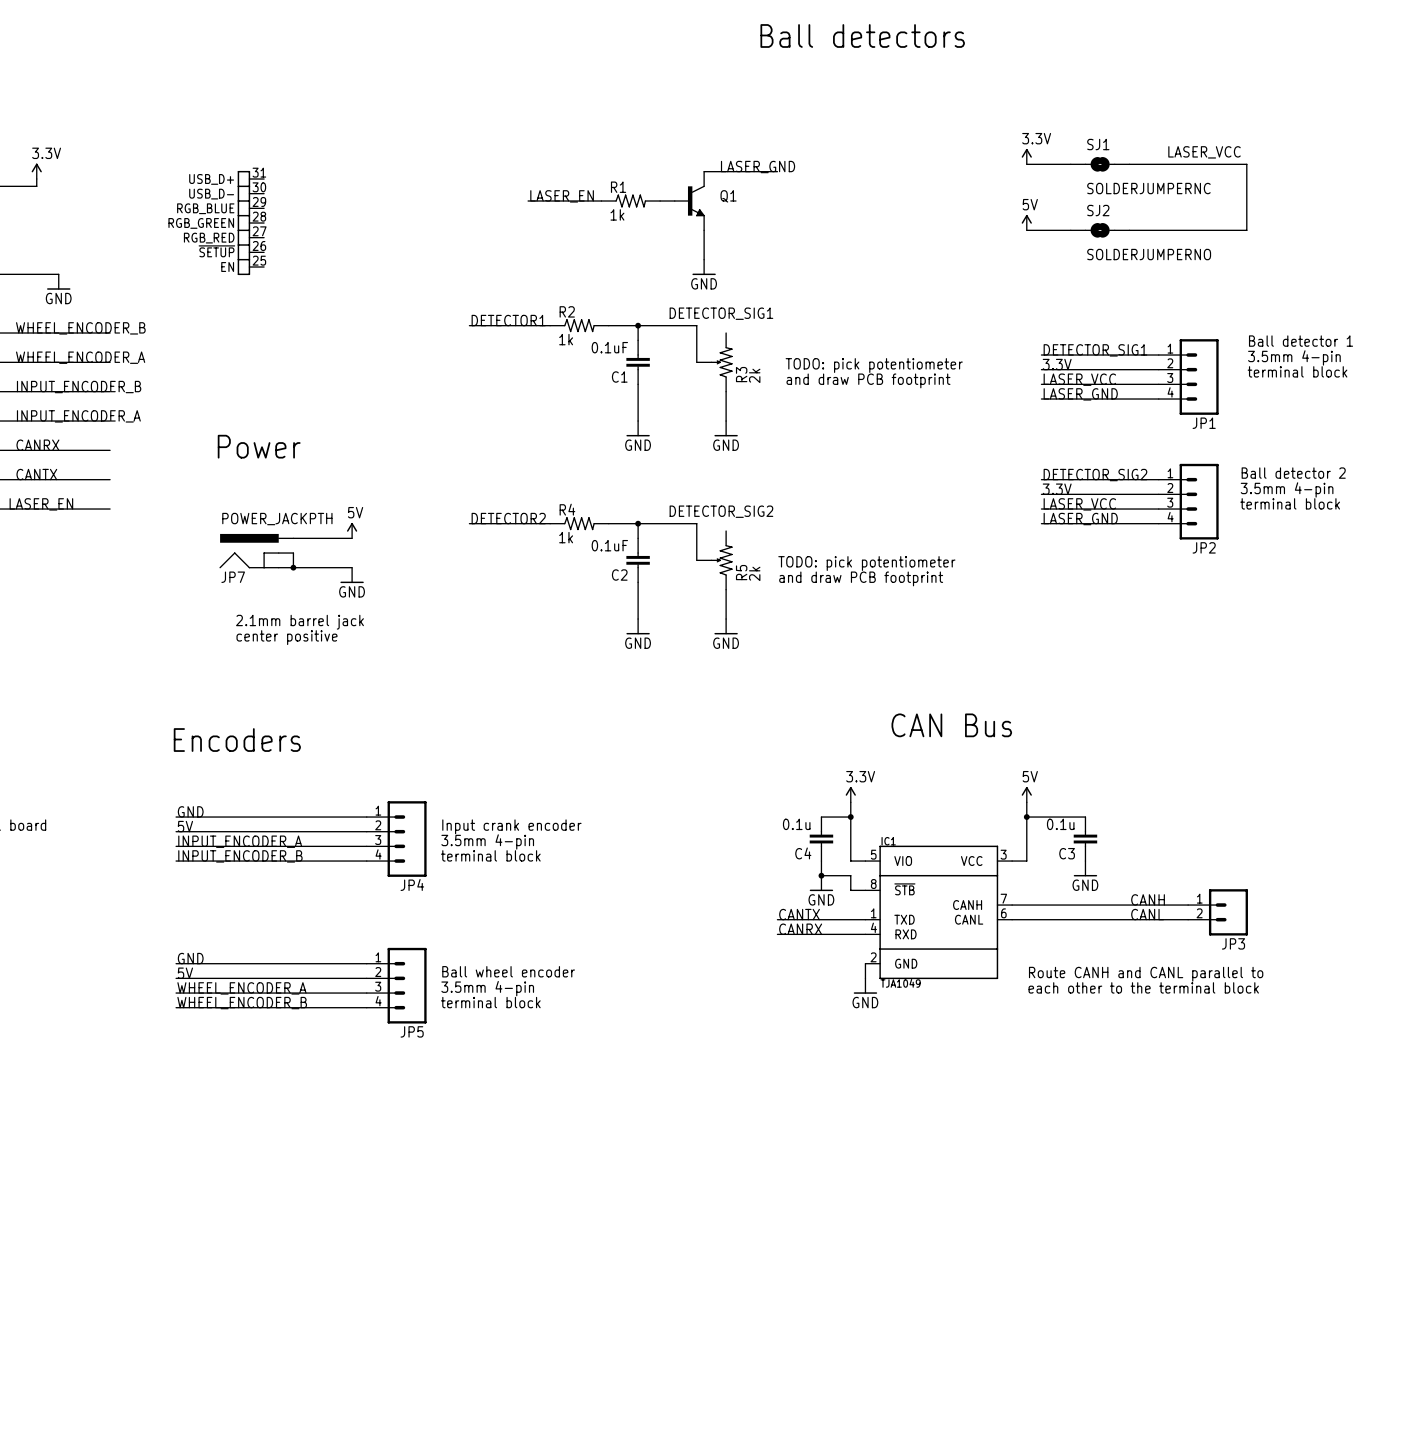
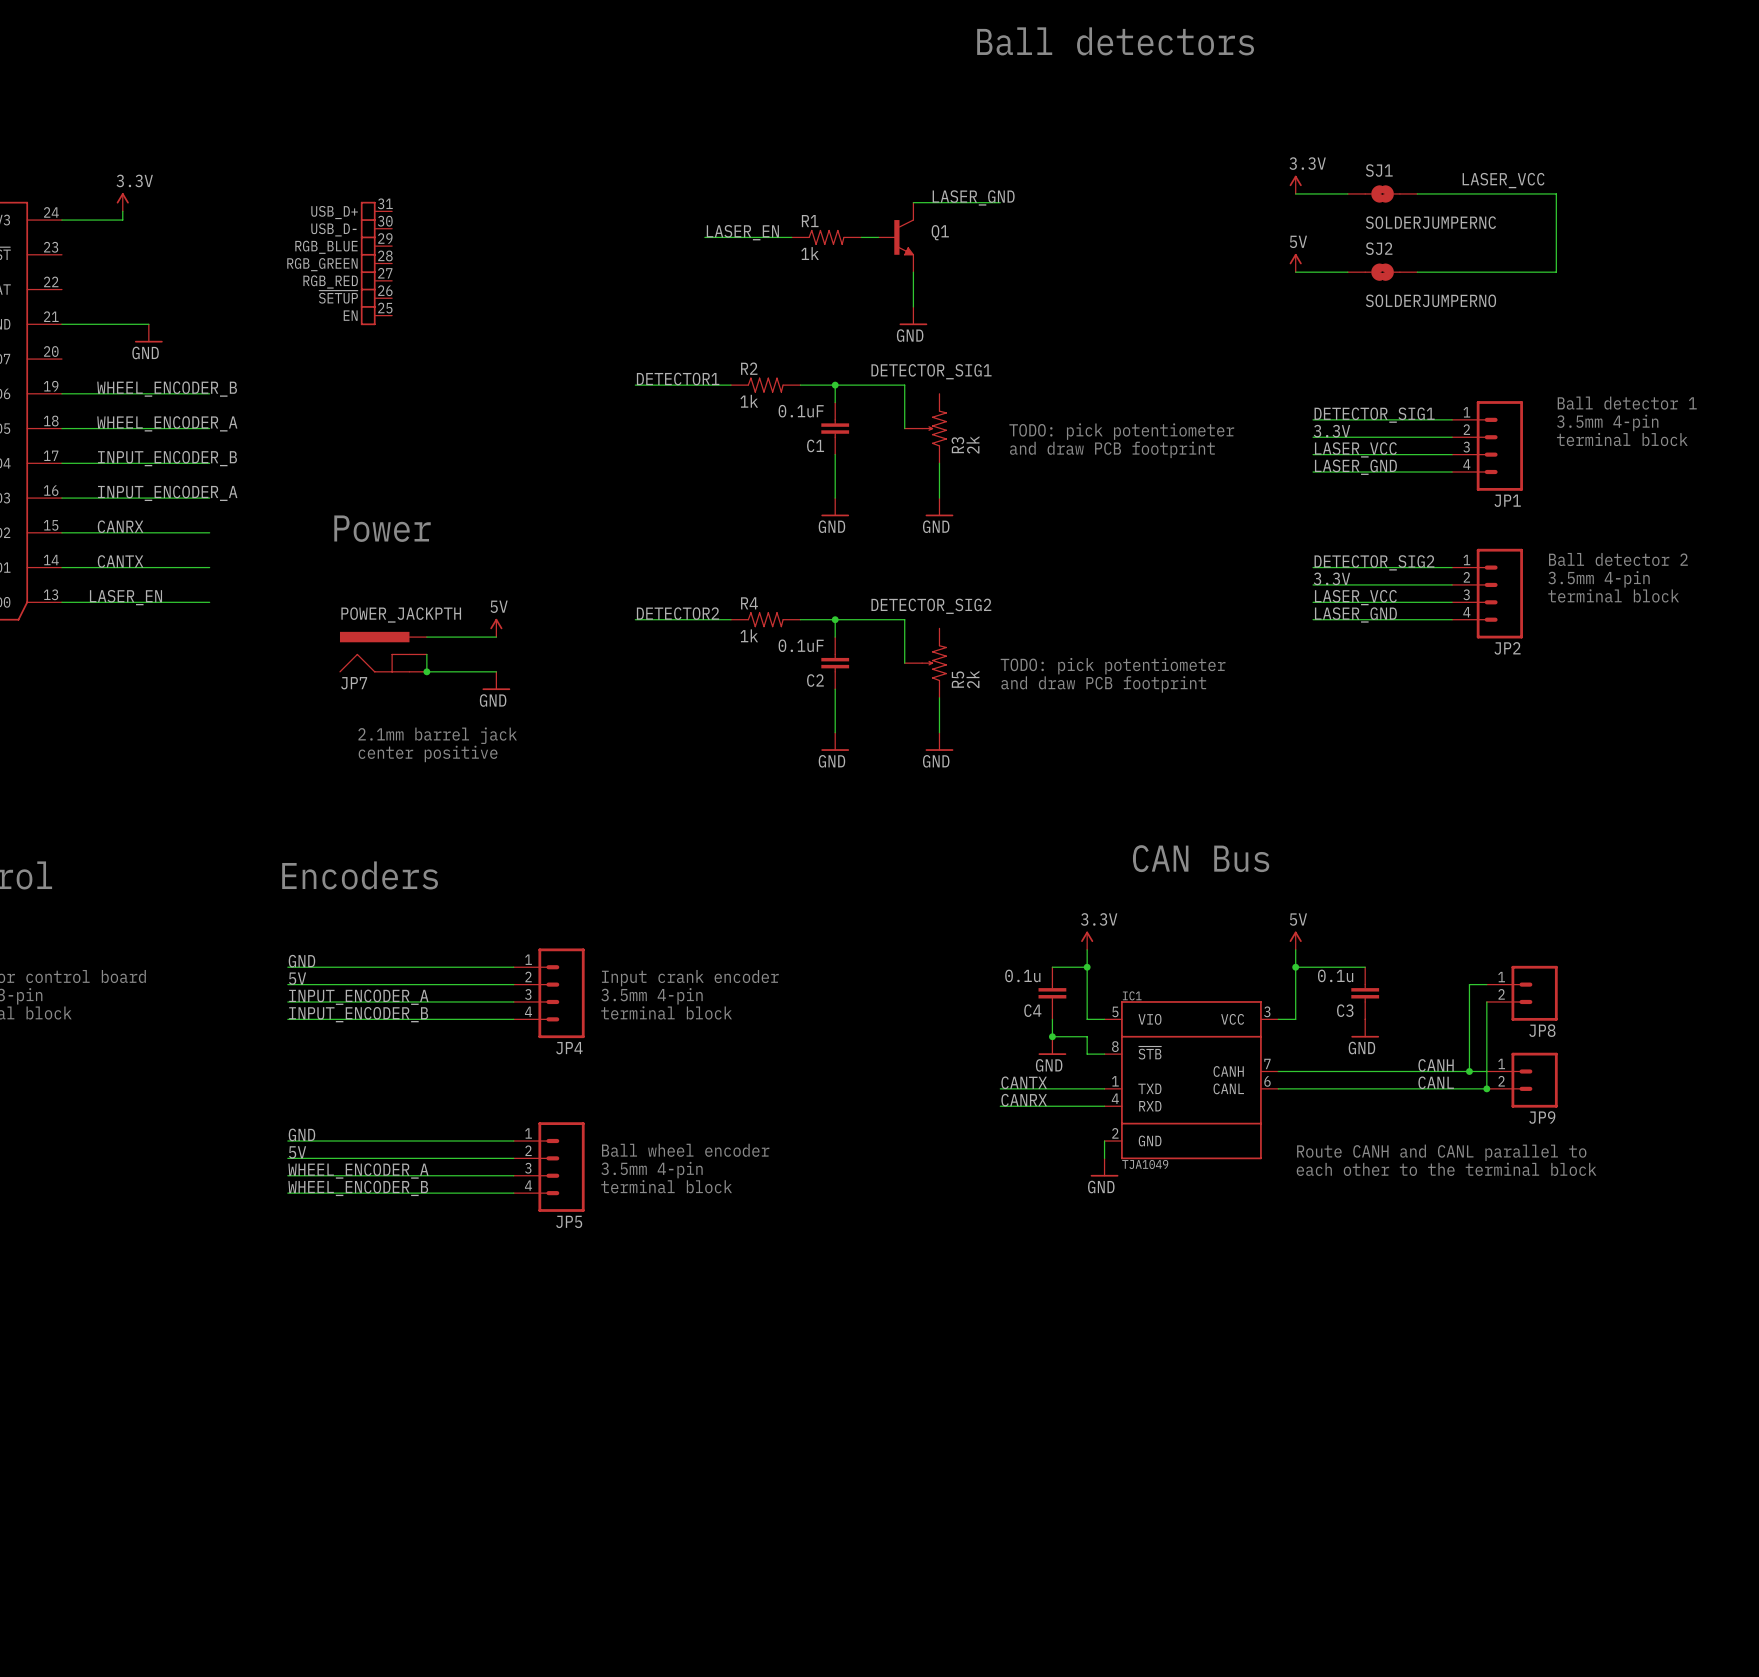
wire: none -> (1486, 984) (1469, 984) (1469, 1071)
JP8: none -> (1522, 993)
wire: none -> (1486, 1001) (1486, 1088)
junction: none -> (1469, 1071)
junction: none -> (1486, 1088)
JP3 name: JP3 (1233, 943) -> JP9 (1542, 1117)

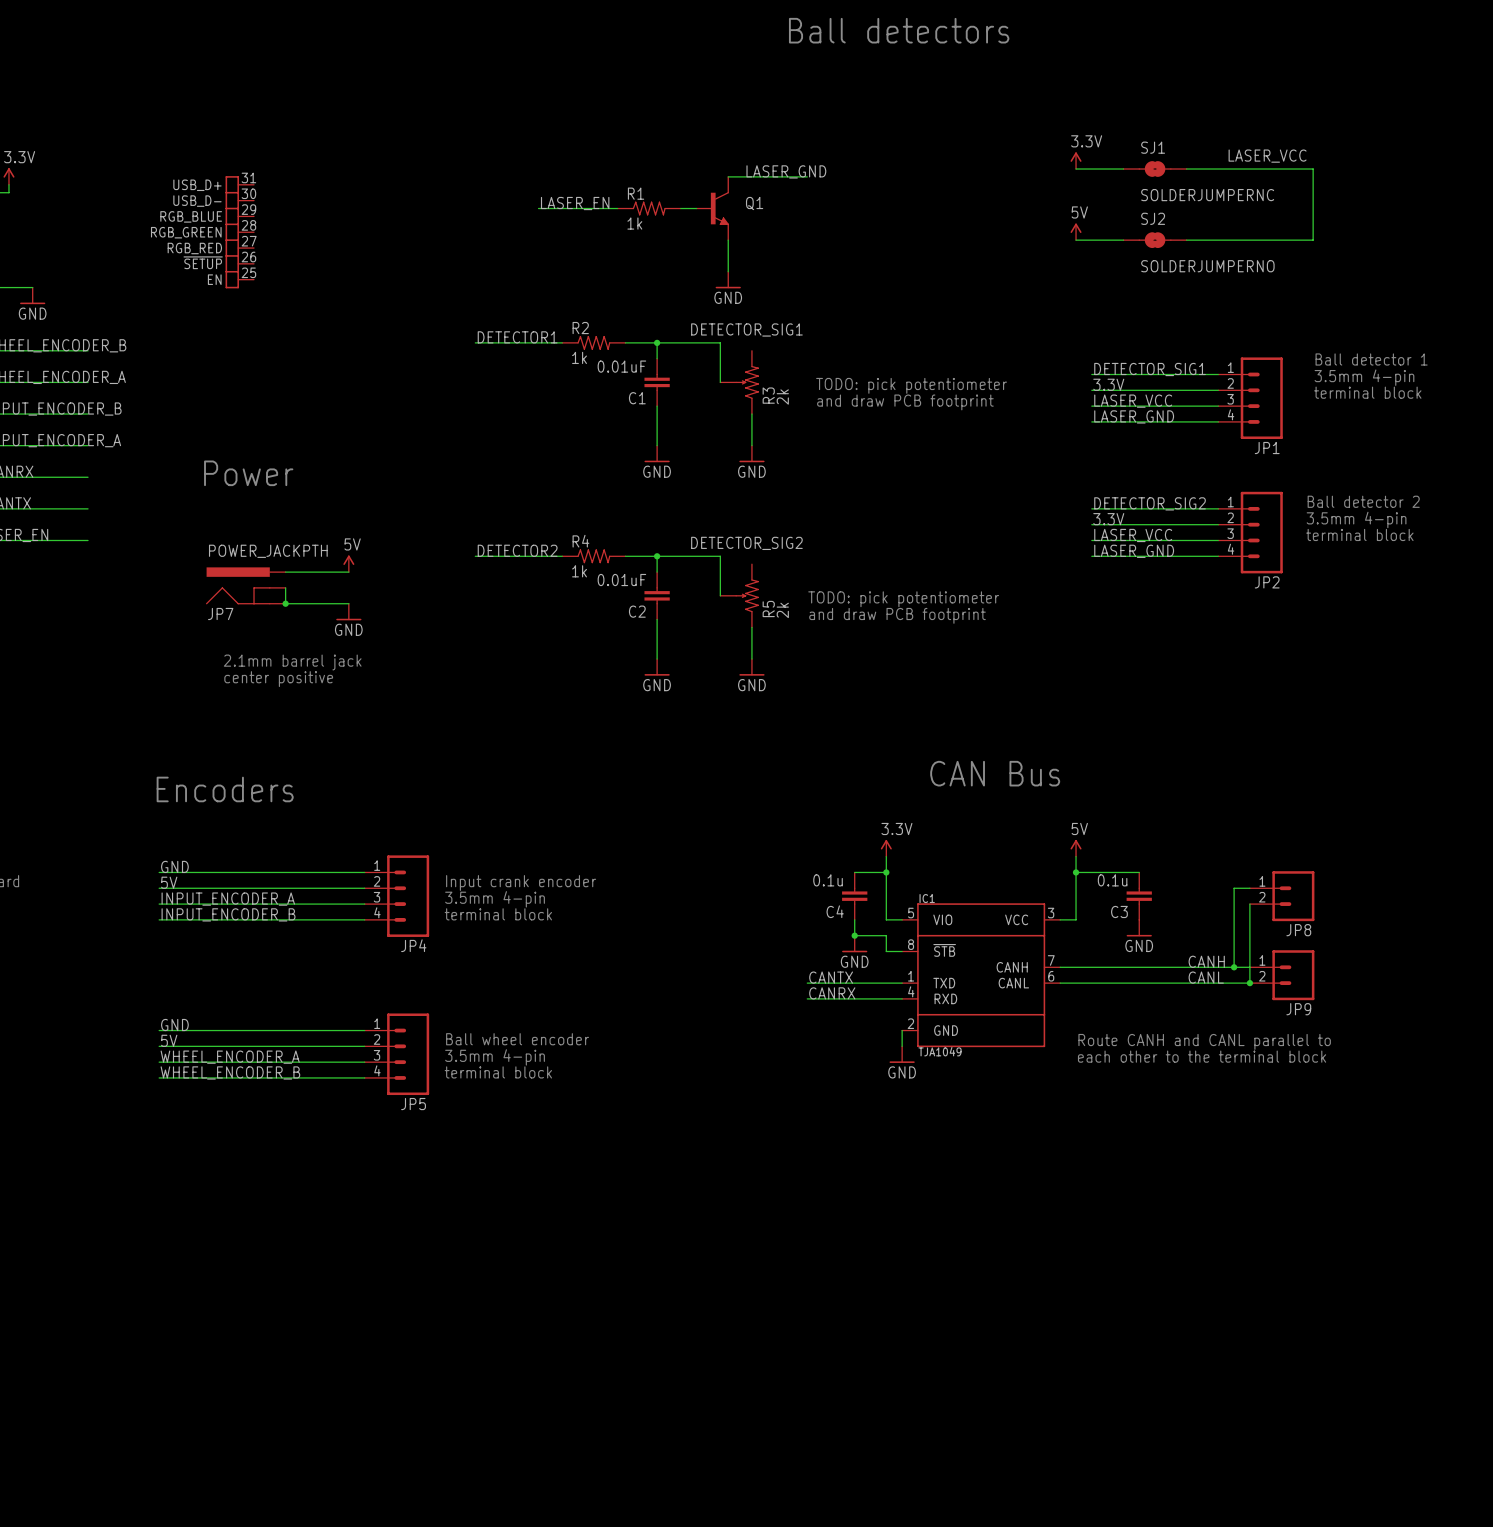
C1 value: 0.1uF (801, 411) -> 0.01uF (621, 366)
C2 value: 0.1uF (801, 645) -> 0.01uF (621, 580)

